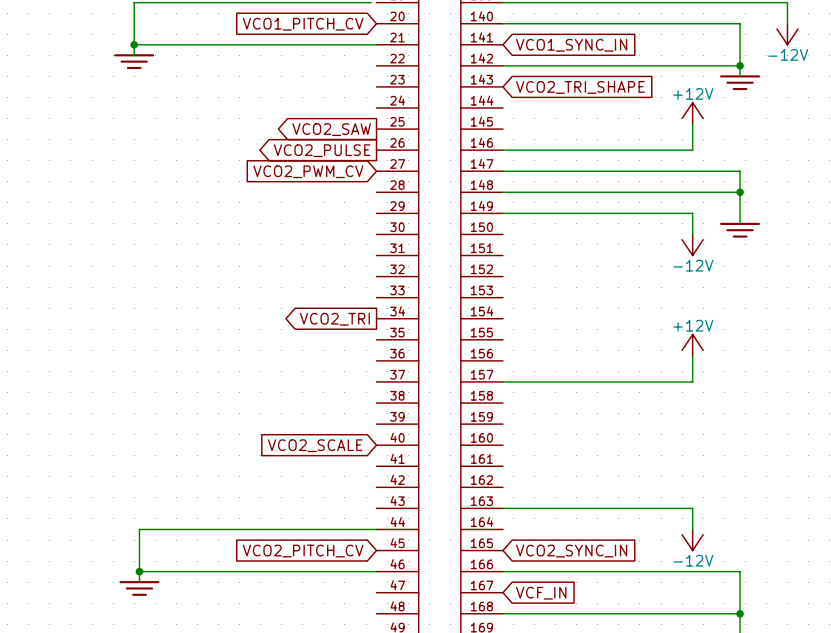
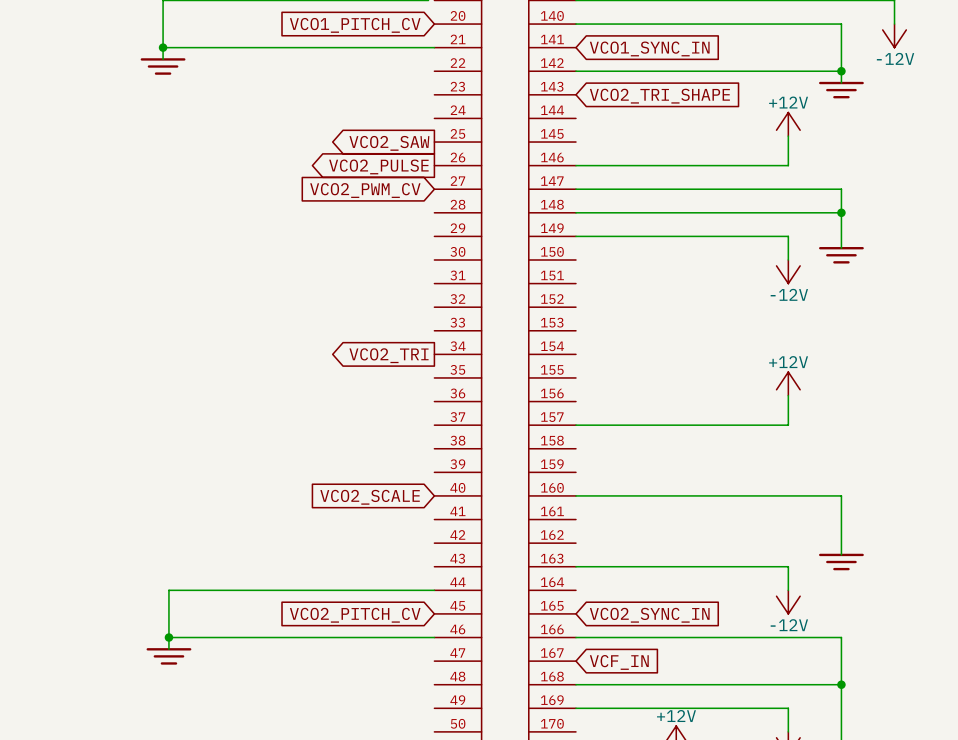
wire: none -> (575, 495) (841, 495) (841, 554)
power symbol: none -> (841, 562)

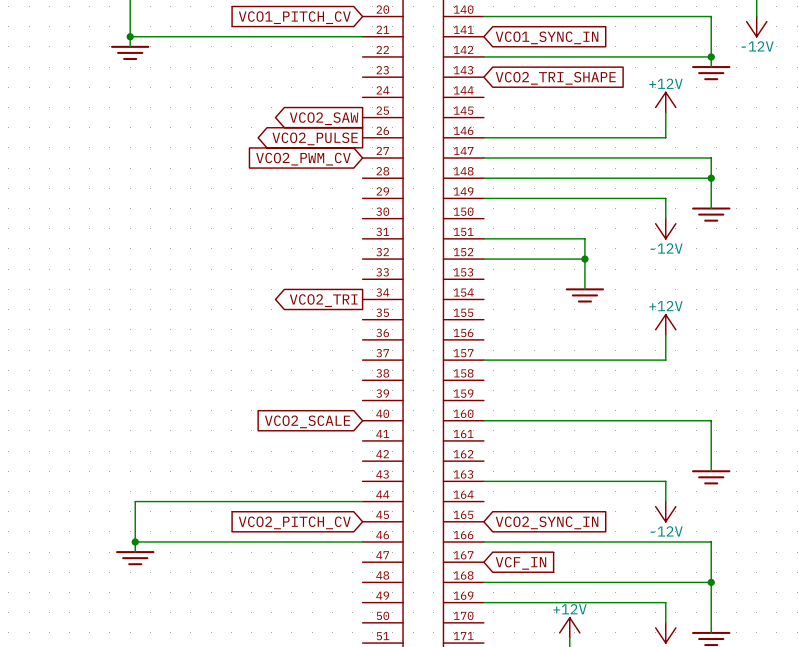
wire: none -> (483, 238) (584, 238) (584, 289)
wire: none -> (483, 259) (584, 259)
junction: none -> (584, 259)
power symbol: none -> (584, 295)

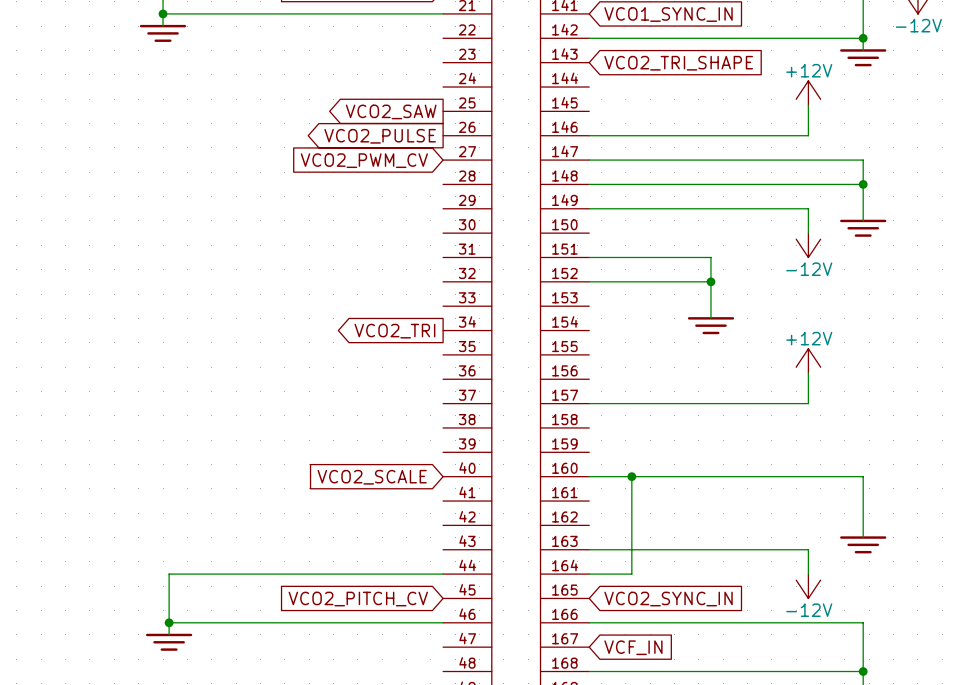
wire: none -> (631, 476) (631, 574) (589, 574)
junction: none -> (631, 476)

